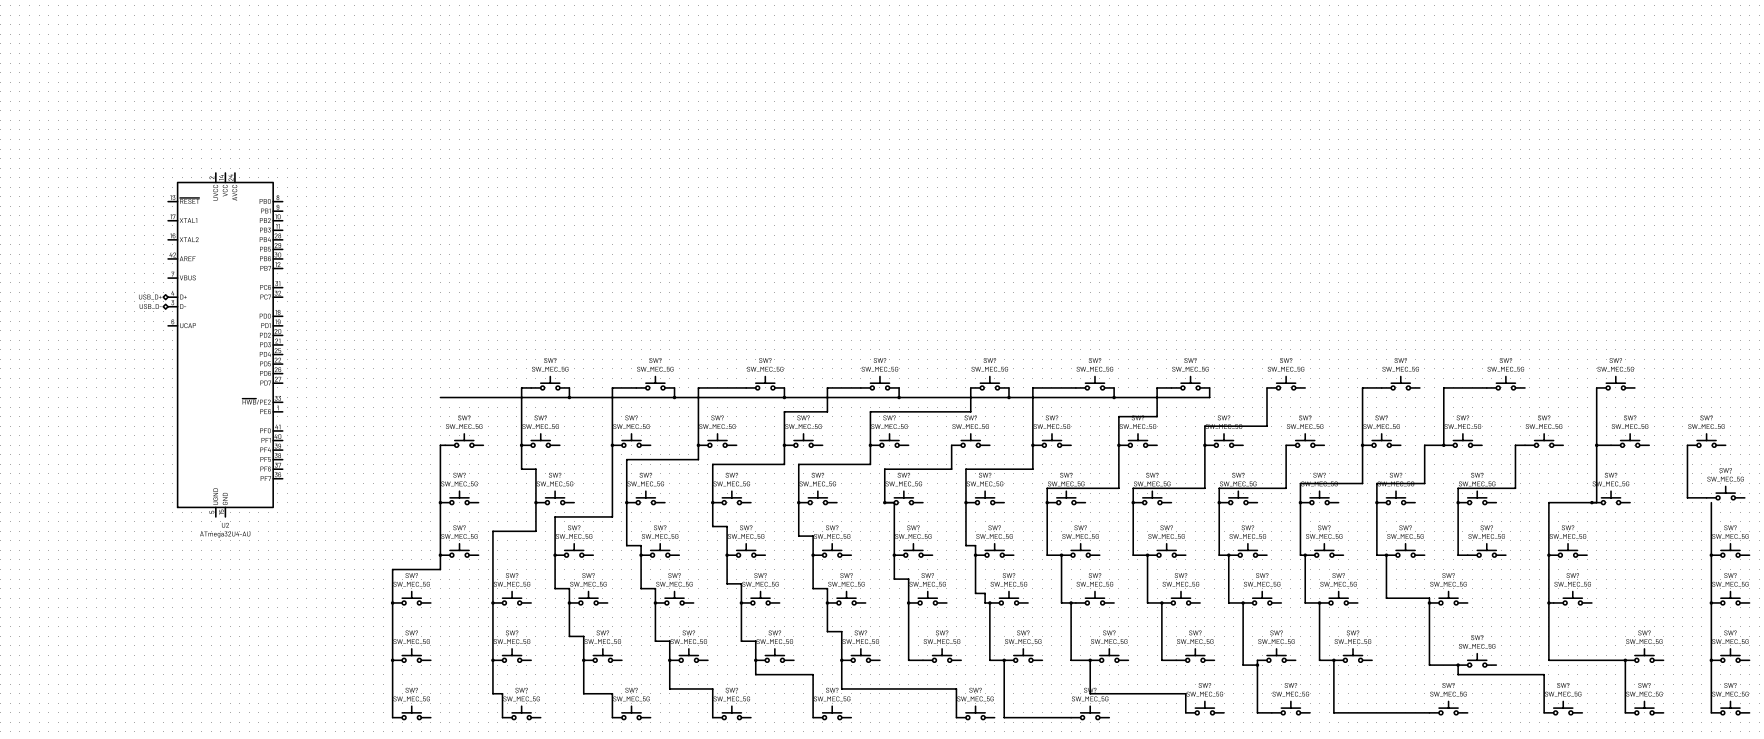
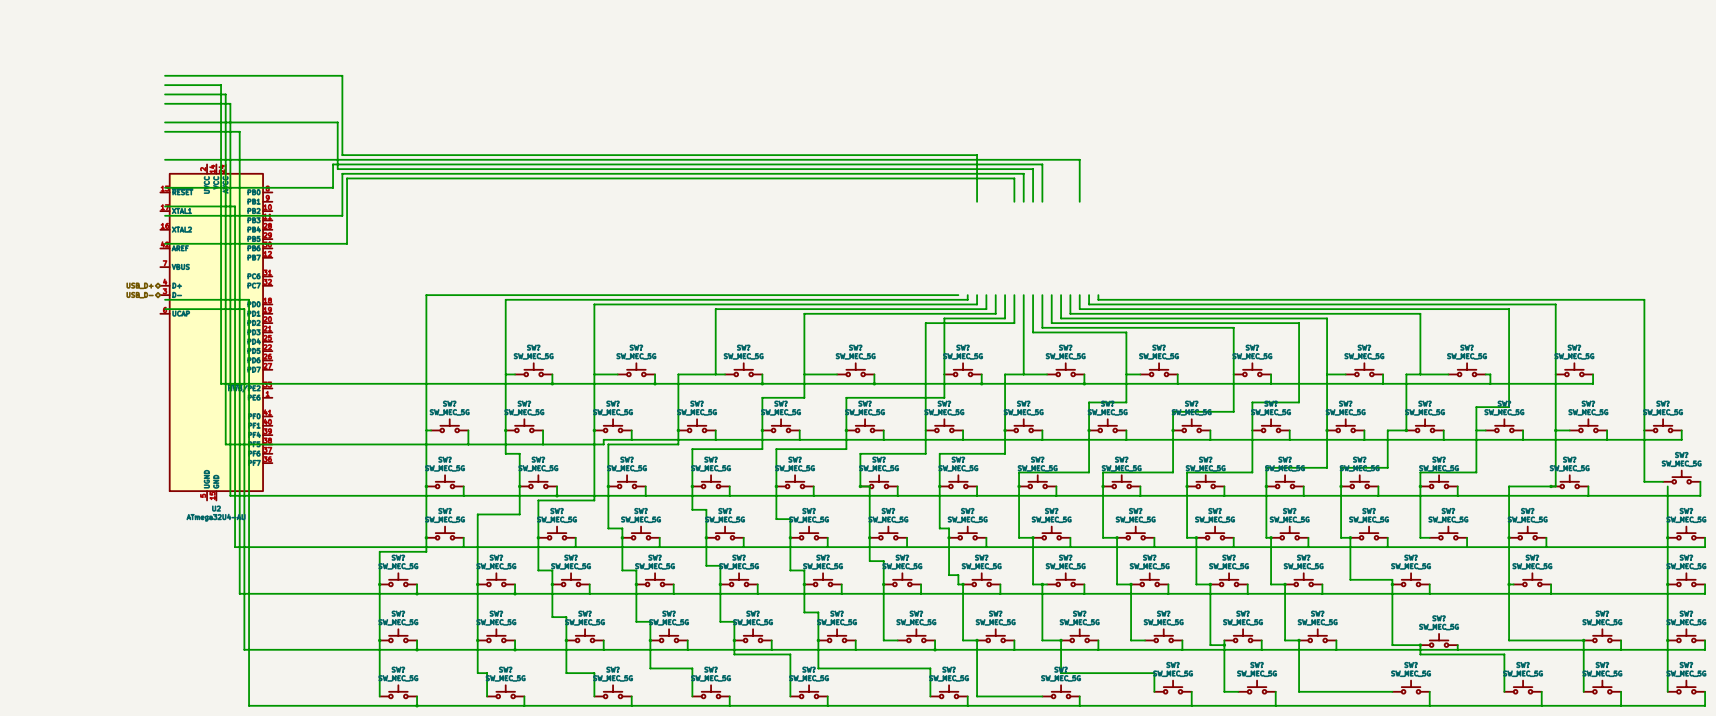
wire: none -> (165, 75) (342, 75) (342, 155) (977, 155) (977, 201)
wire: none -> (165, 85) (221, 85) (221, 383) (426, 383)
wire: none -> (165, 94) (225, 94) (225, 444) (603, 444) (603, 439) (1681, 439) (1681, 430)
wire: none -> (165, 103) (230, 103) (230, 495) (1700, 495) (1700, 481)
wire: none -> (165, 122) (337, 122) (337, 169) (1033, 169) (1033, 201)
wire: none -> (165, 131) (239, 131) (239, 593) (1705, 593) (1705, 584)
wire: none -> (165, 159) (1079, 159) (1079, 201)
wire: none -> (165, 187) (333, 187) (333, 164) (1042, 164) (1042, 201)
wire: none -> (1014, 201) (1014, 178) (347, 178) (347, 243) (165, 243)
wire: none -> (1023, 201) (1023, 173) (342, 173) (342, 215) (165, 215)
wire: none -> (165, 206) (235, 206) (235, 547) (1705, 547) (1705, 537)
wire: none -> (958, 295) (426, 295) (426, 430)
wire: none -> (967, 295) (967, 299) (505, 299) (505, 374)
wire: none -> (977, 295) (977, 304) (594, 304) (594, 374)
wire: none -> (986, 295) (986, 309) (715, 309) (715, 374)
wire: none -> (995, 295) (995, 313) (804, 313) (804, 374)
wire: none -> (1005, 295) (1005, 318) (944, 318) (944, 374)
wire: none -> (1014, 295) (1014, 323) (925, 323) (925, 430)
wire: none -> (1023, 295) (1023, 374)
wire: none -> (1033, 295) (1033, 332) (1126, 332) (1126, 374)
wire: none -> (1042, 295) (1042, 327) (1233, 327) (1233, 374)
wire: none -> (1051, 295) (1051, 323) (1299, 323) (1299, 402) (1252, 402) (1252, 430)
wire: none -> (1061, 295) (1061, 318) (1327, 318) (1327, 374)
wire: none -> (1070, 295) (1070, 313) (1420, 313) (1420, 374)
wire: none -> (1079, 295) (1079, 309) (1509, 309) (1509, 407) (1476, 407) (1476, 430)
wire: none -> (1089, 295) (1089, 304) (1555, 304) (1555, 374)
wire: none -> (1098, 295) (1098, 299) (1644, 299) (1644, 430)
wire: none -> (165, 299) (249, 299) (249, 705) (1705, 705) (1705, 691)
wire: none -> (165, 309) (244, 309) (244, 649) (1705, 649) (1705, 640)
wire: none -> (1271, 374) (1271, 383)
wire: none -> (1383, 374) (1383, 383)
wire: none -> (1485, 374) (1490, 374) (1490, 383)
wire: none -> (1593, 374) (1593, 383) (1177, 383)
wire: none -> (468, 430) (468, 444)
wire: none -> (543, 430) (543, 444)
wire: none -> (631, 430) (631, 439)
wire: none -> (715, 430) (715, 439)
wire: none -> (799, 430) (799, 439)
wire: none -> (883, 430) (883, 439)
wire: none -> (963, 430) (963, 439)
wire: none -> (1042, 430) (1042, 439)
wire: none -> (1126, 430) (1126, 439)
wire: none -> (1210, 430) (1210, 439)
wire: none -> (1289, 430) (1289, 439)
wire: none -> (1364, 430) (1364, 439)
wire: none -> (1443, 430) (1443, 439)
wire: none -> (1523, 430) (1523, 439)
wire: none -> (1607, 430) (1607, 439)
wire: none -> (463, 486) (463, 495)
wire: none -> (557, 486) (557, 495)
wire: none -> (645, 486) (645, 495)
wire: none -> (729, 486) (729, 495)
wire: none -> (813, 486) (813, 495)
wire: none -> (897, 486) (897, 495)
wire: none -> (977, 486) (977, 495)
wire: none -> (1056, 486) (1056, 495)
wire: none -> (1140, 486) (1140, 495)
wire: none -> (1224, 486) (1224, 495)
wire: none -> (1303, 486) (1303, 495)
wire: none -> (1378, 486) (1378, 495)
wire: none -> (1457, 486) (1457, 495)
wire: none -> (1588, 486) (1588, 495)
wire: none -> (463, 537) (463, 547)
wire: none -> (575, 537) (575, 547)
wire: none -> (659, 537) (659, 547)
wire: none -> (743, 537) (743, 547)
wire: none -> (827, 537) (827, 547)
wire: none -> (907, 537) (907, 547)
wire: none -> (986, 537) (986, 547)
wire: none -> (1070, 537) (1070, 547)
wire: none -> (1154, 537) (1154, 547)
wire: none -> (1233, 537) (1233, 547)
wire: none -> (1308, 537) (1308, 547)
wire: none -> (1387, 537) (1387, 547)
wire: none -> (1467, 537) (1467, 547)
wire: none -> (1546, 537) (1546, 547)
wire: none -> (417, 584) (417, 593)
wire: none -> (515, 584) (515, 593)
wire: none -> (589, 584) (589, 593)
wire: none -> (673, 584) (673, 593)
wire: none -> (757, 584) (757, 593)
wire: none -> (841, 584) (841, 593)
wire: none -> (921, 584) (921, 593)
wire: none -> (1000, 584) (1000, 593)
wire: none -> (1084, 584) (1084, 593)
wire: none -> (1168, 584) (1168, 593)
wire: none -> (1247, 584) (1247, 593)
wire: none -> (1322, 584) (1322, 593)
wire: none -> (1429, 584) (1429, 593)
wire: none -> (1551, 584) (1551, 593)
wire: none -> (417, 640) (417, 649)
wire: none -> (515, 640) (515, 649)
wire: none -> (603, 640) (603, 649)
wire: none -> (687, 640) (687, 649)
wire: none -> (771, 640) (771, 649)
wire: none -> (855, 640) (855, 649)
wire: none -> (935, 640) (935, 649)
wire: none -> (1014, 640) (1014, 649)
wire: none -> (1098, 640) (1098, 649)
wire: none -> (1182, 640) (1182, 649)
wire: none -> (1261, 640) (1261, 649)
wire: none -> (1336, 640) (1336, 649)
wire: none -> (1621, 640) (1621, 649)
wire: none -> (1457, 645) (1457, 649)
wire: none -> (1191, 691) (1191, 705)
wire: none -> (1275, 691) (1275, 705)
wire: none -> (1429, 691) (1429, 705)
wire: none -> (1541, 691) (1541, 705)
wire: none -> (1621, 691) (1621, 705)
wire: none -> (417, 696) (417, 705)
wire: none -> (524, 696) (524, 705)
wire: none -> (631, 696) (631, 705)
wire: none -> (729, 696) (729, 705)
wire: none -> (827, 696) (827, 705)
wire: none -> (967, 696) (967, 705)
wire: none -> (1079, 696) (1079, 705)

